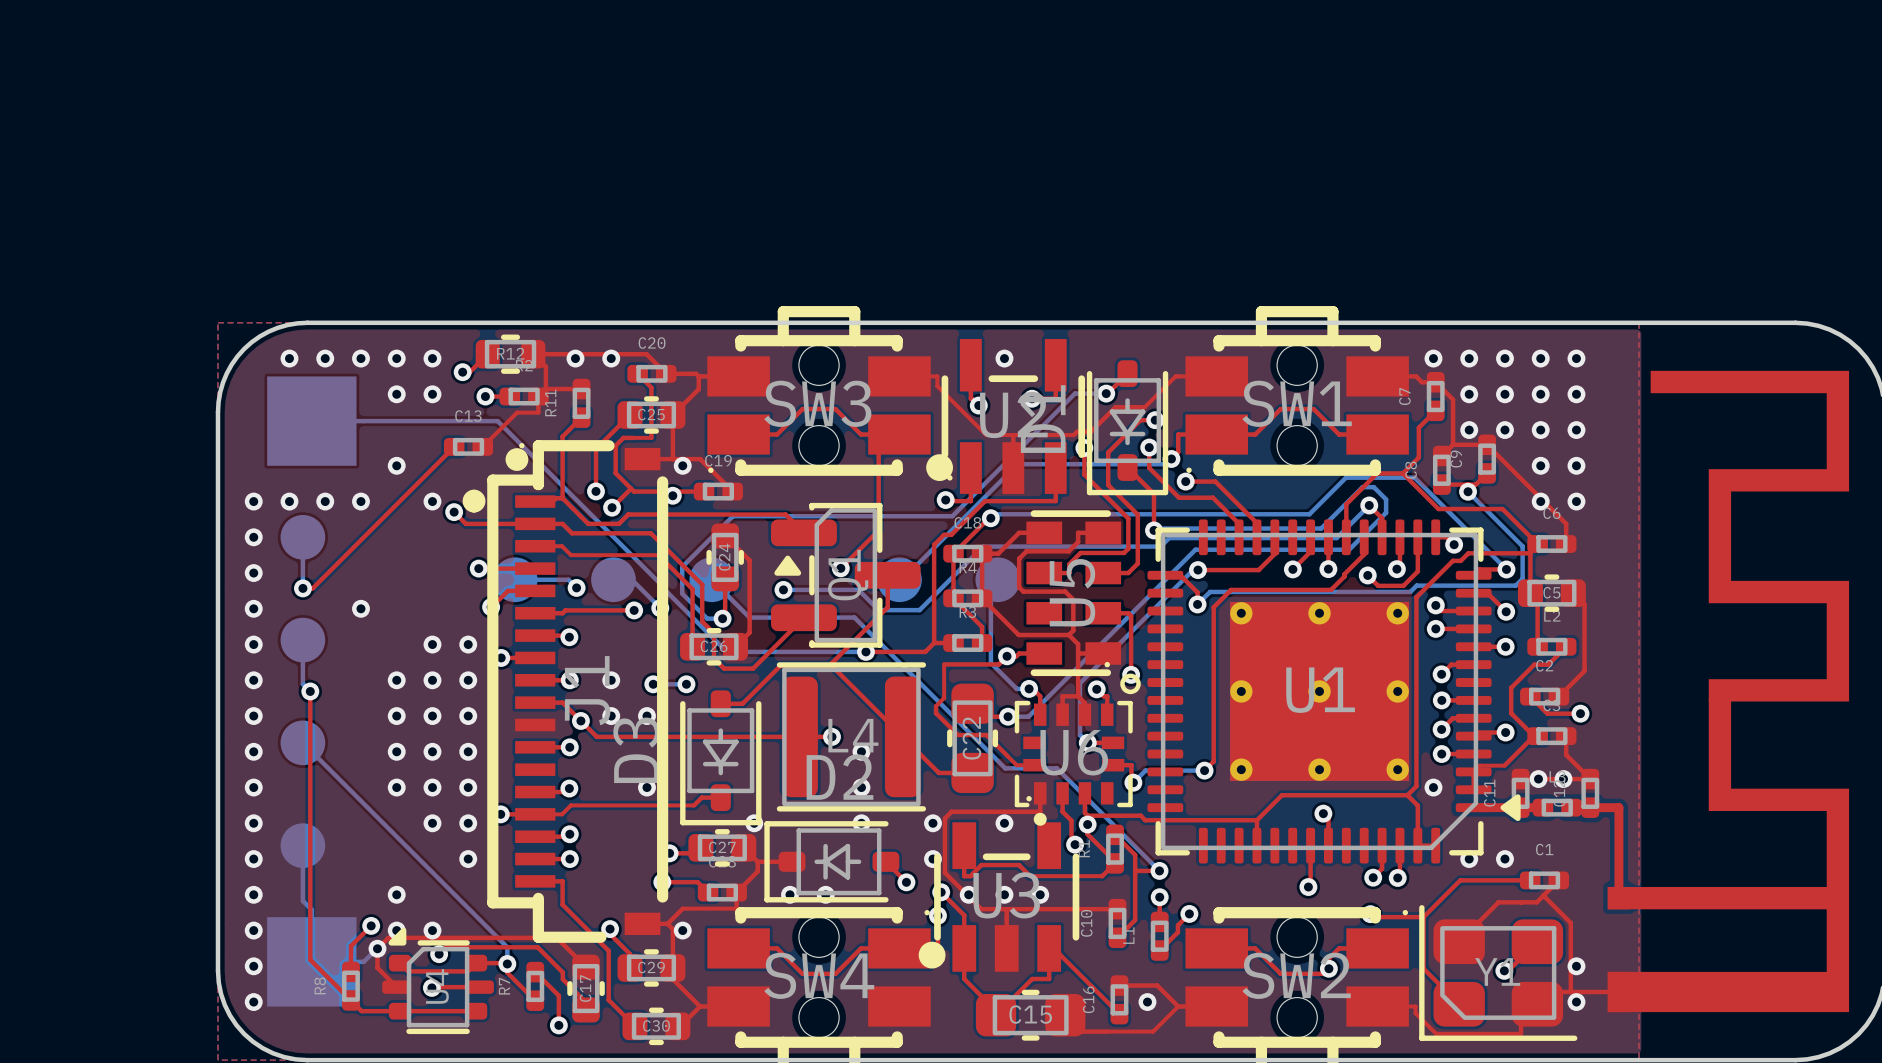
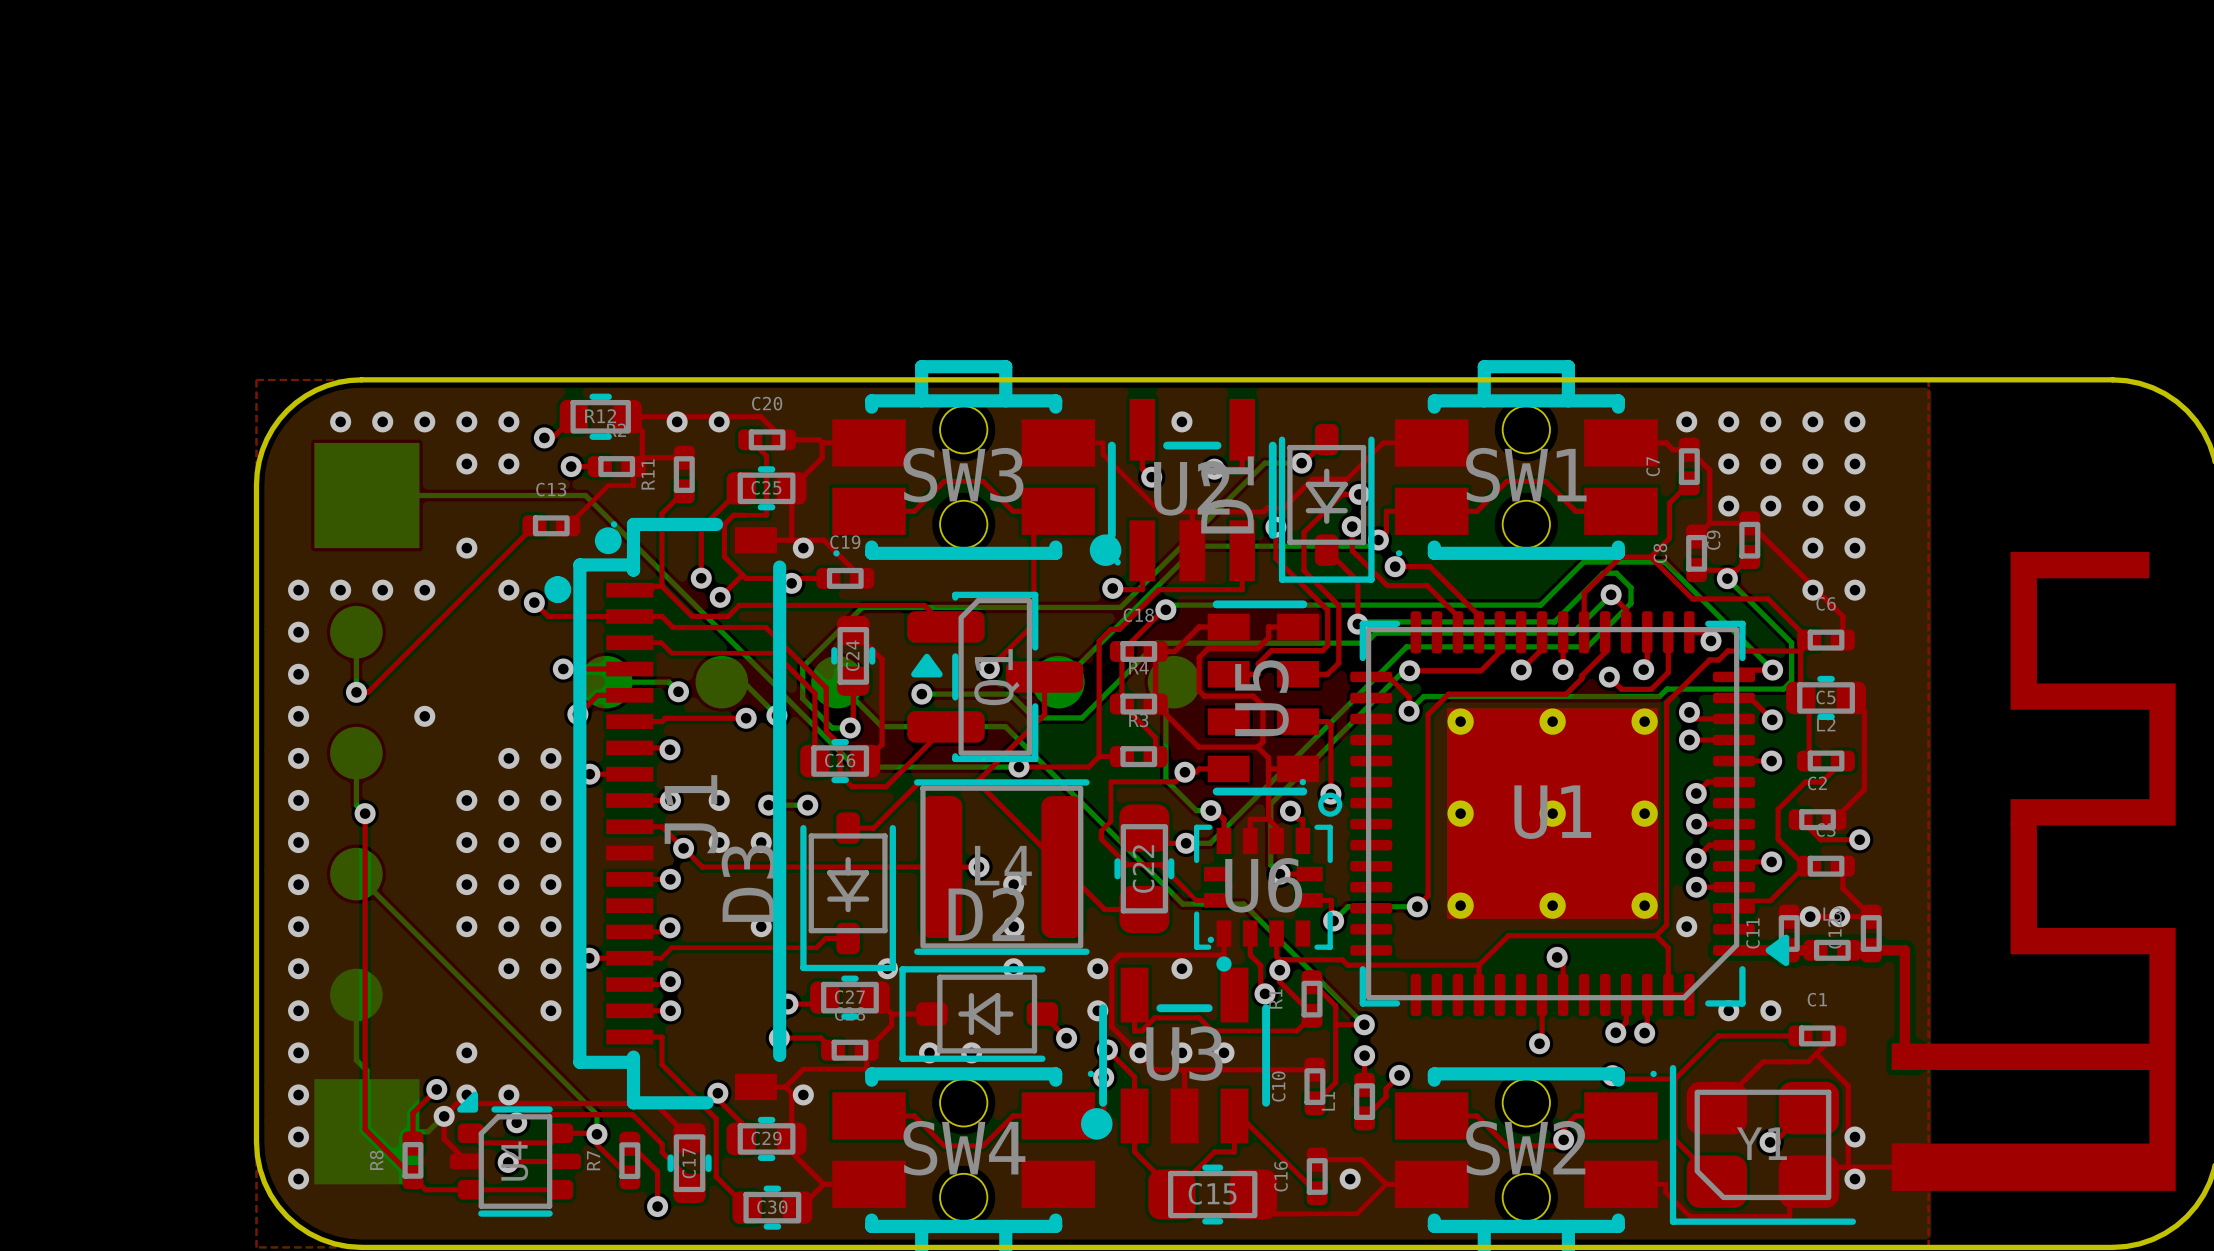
part: (1728, 691) -> none
part: none -> (2033, 871)

